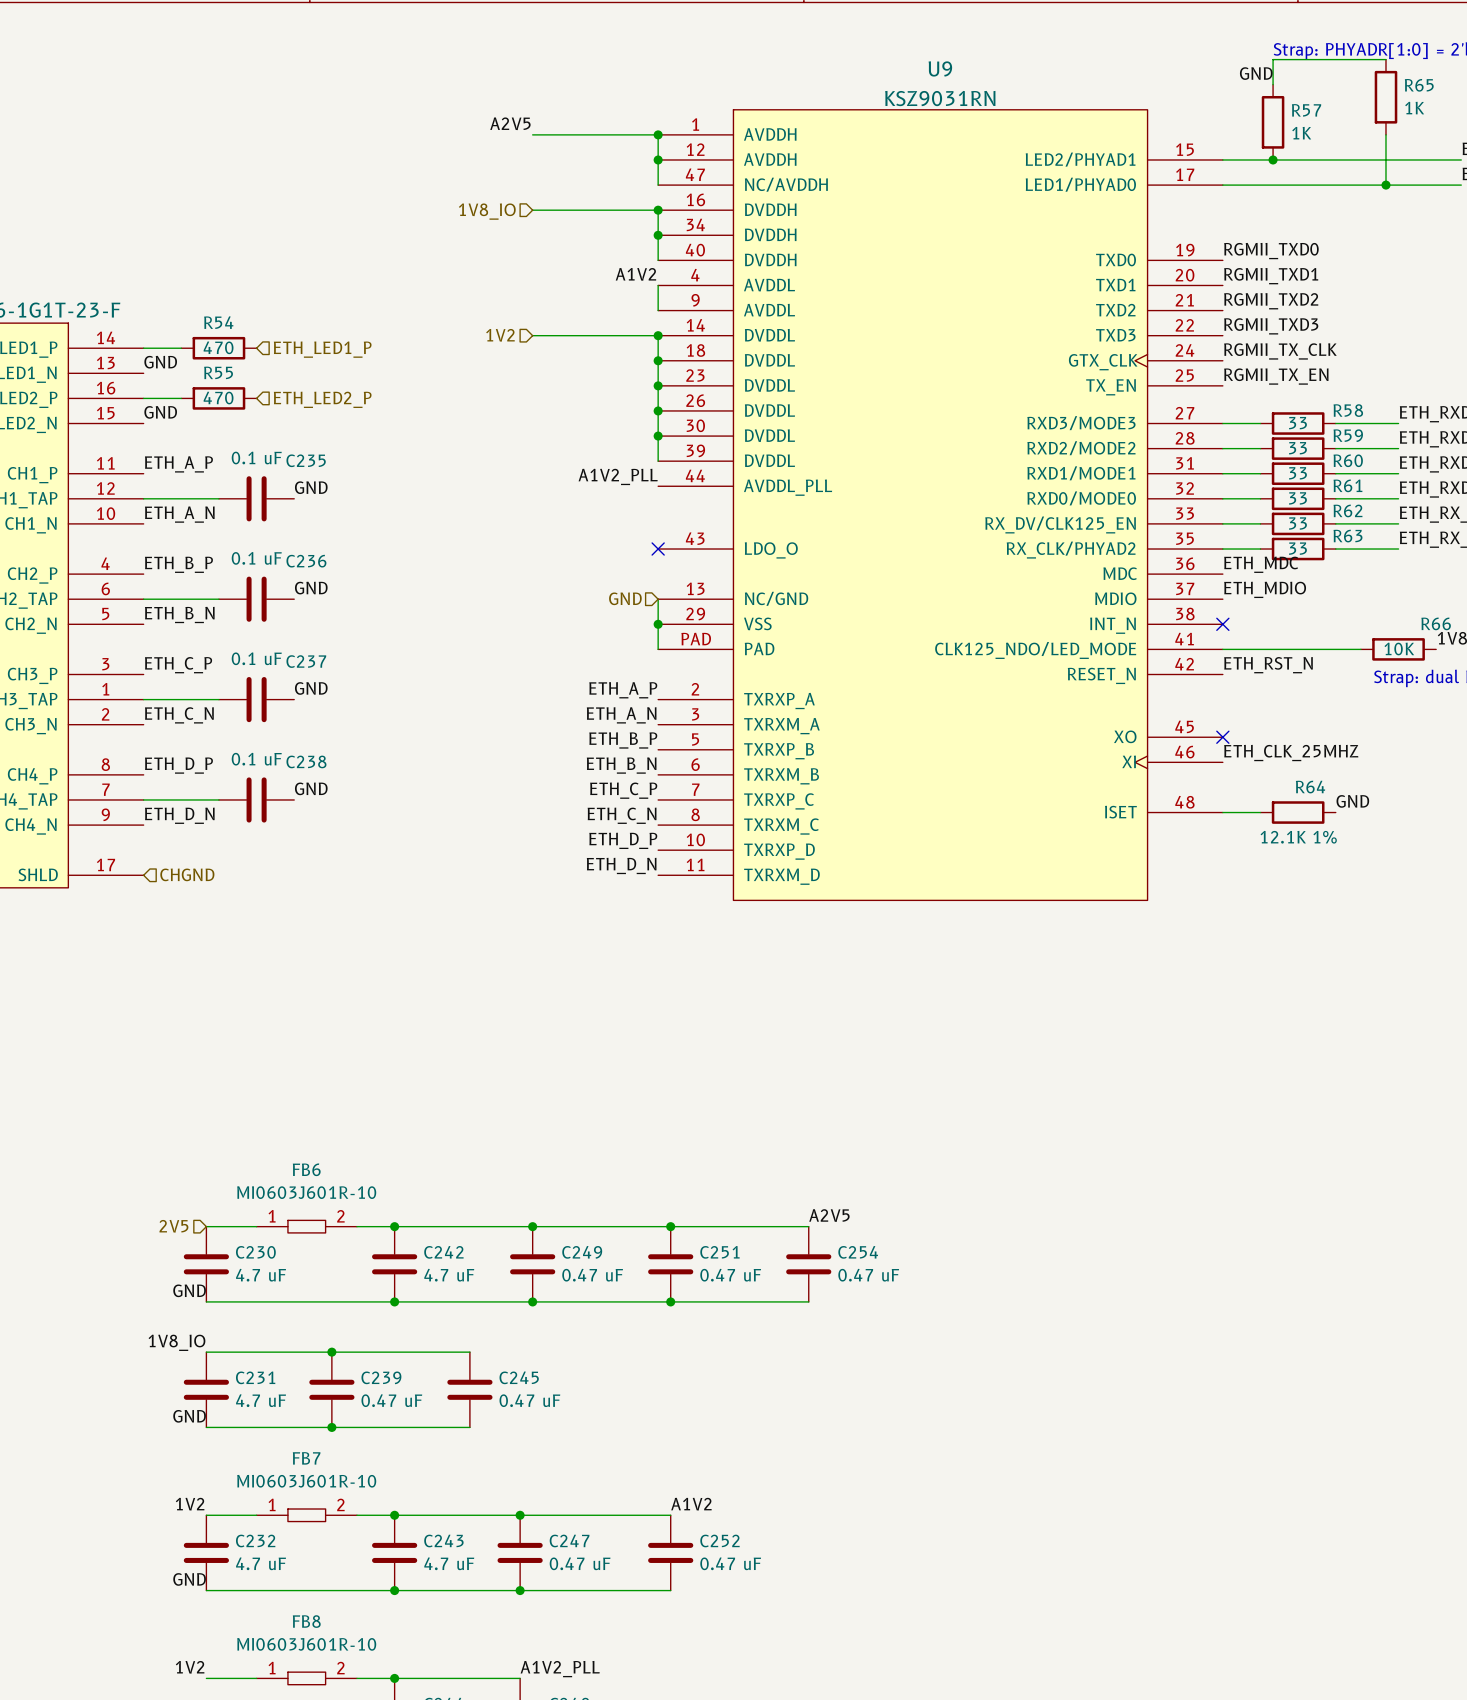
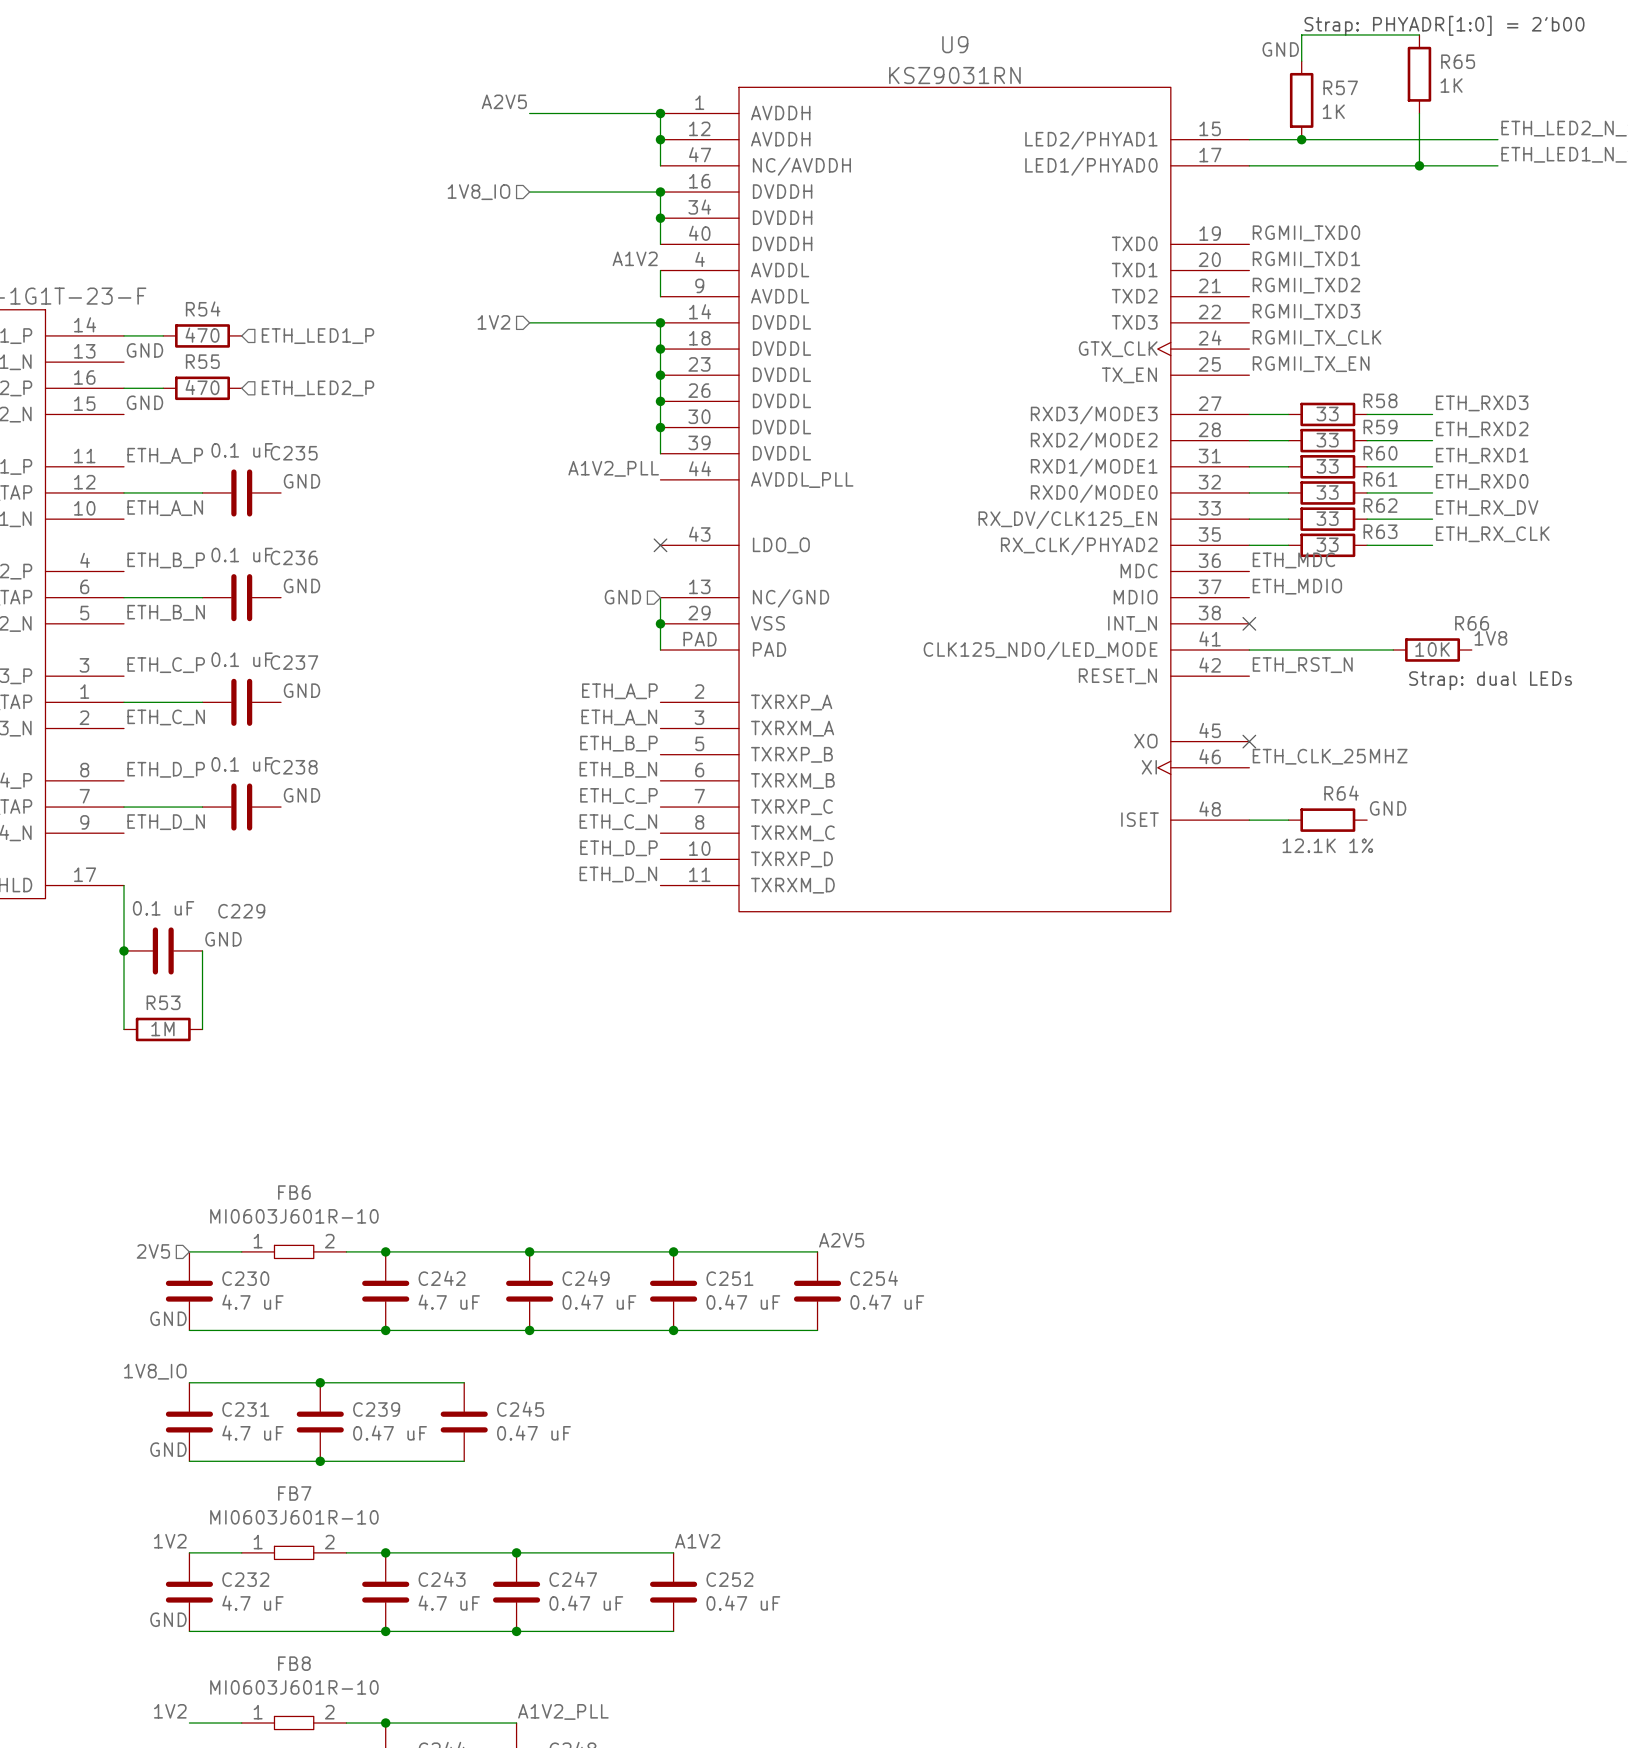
hierarchical label: CHGND (187, 874) -> none
wire: none -> (124, 885) (124, 1029)
label: none -> GND (223, 939)
junction: none -> (124, 950)
C229: none -> 0.1 uF (163, 950)
wire: none -> (202, 950) (202, 1029)
R53: none -> 1M (163, 1029)

